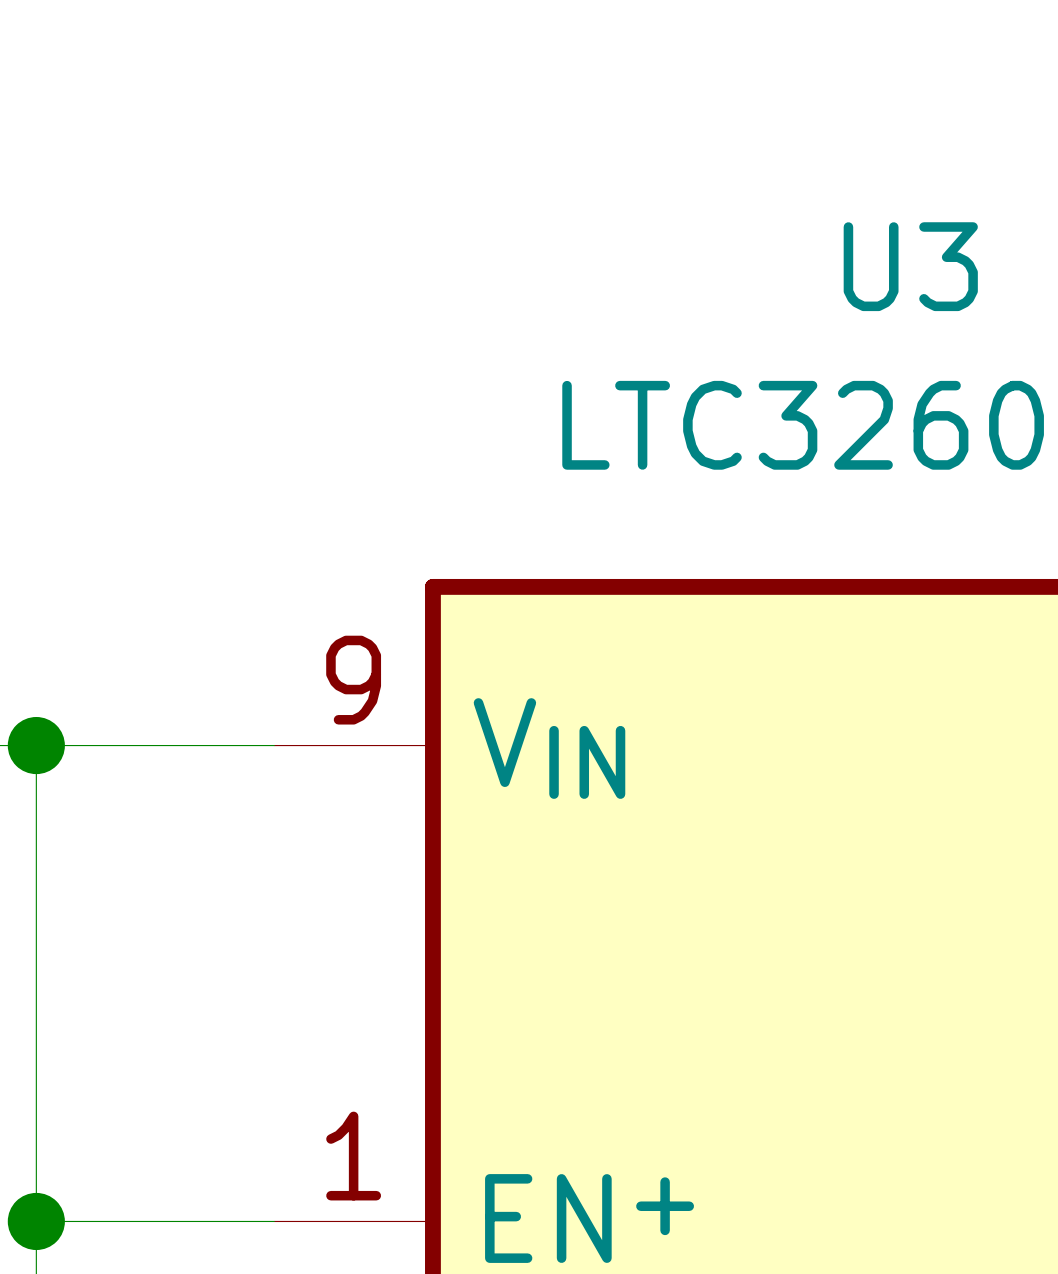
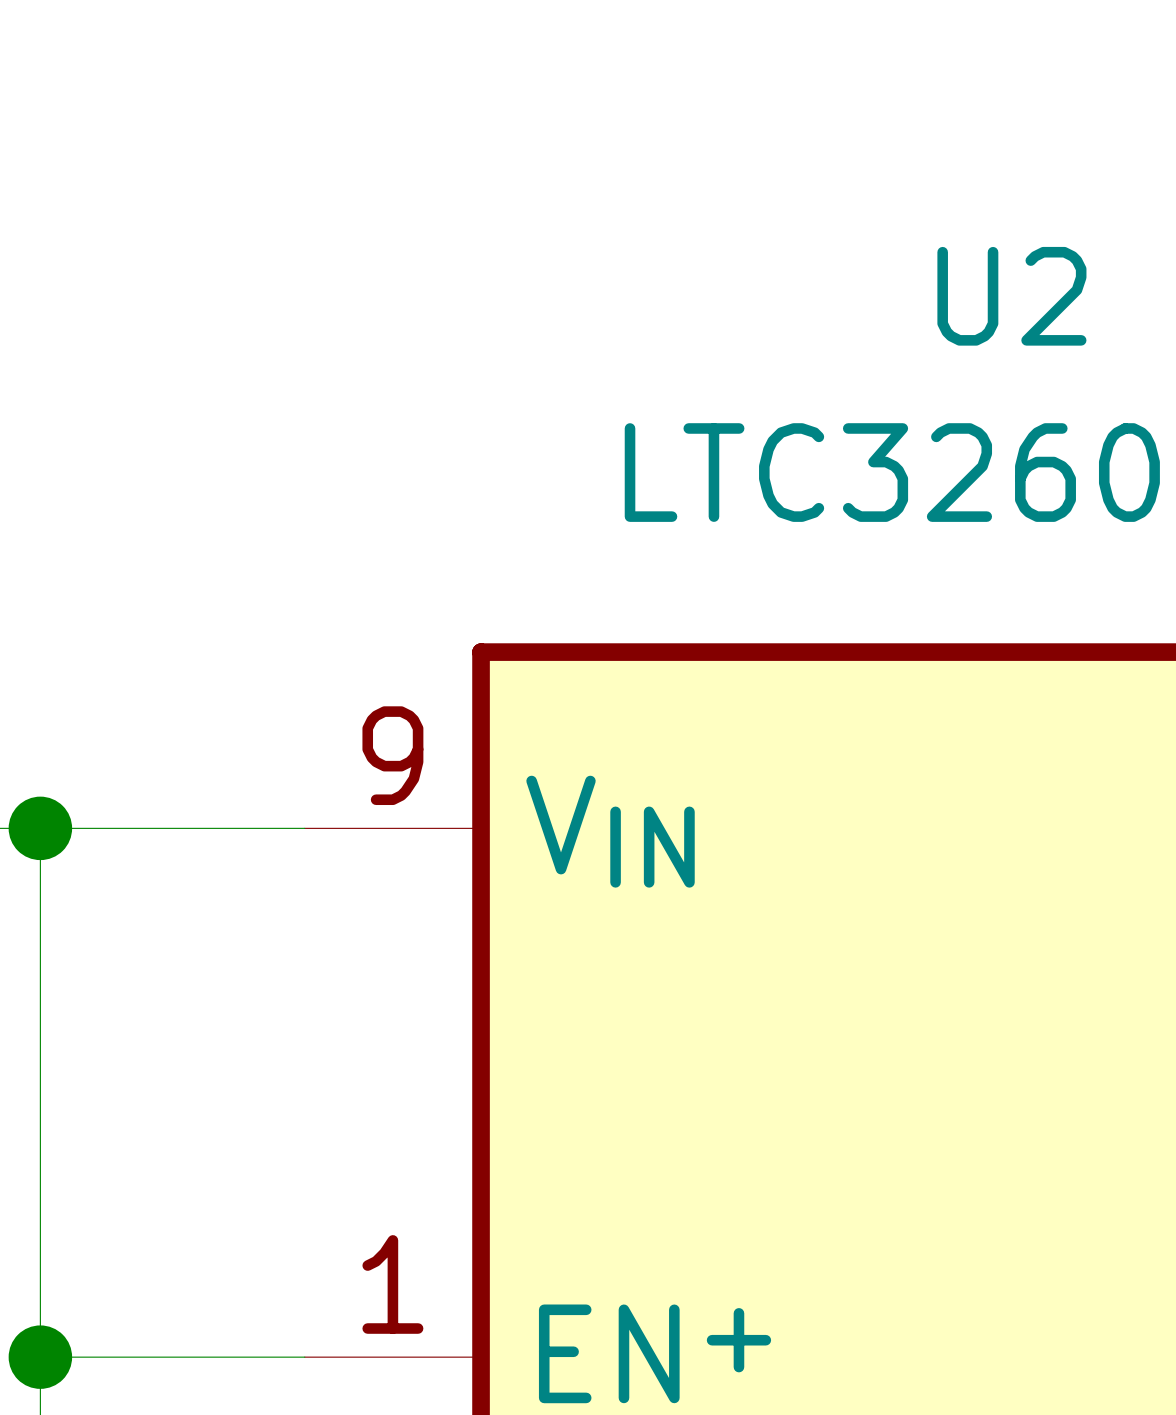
U3 name: U3 (910, 266) -> U2 (1011, 296)

